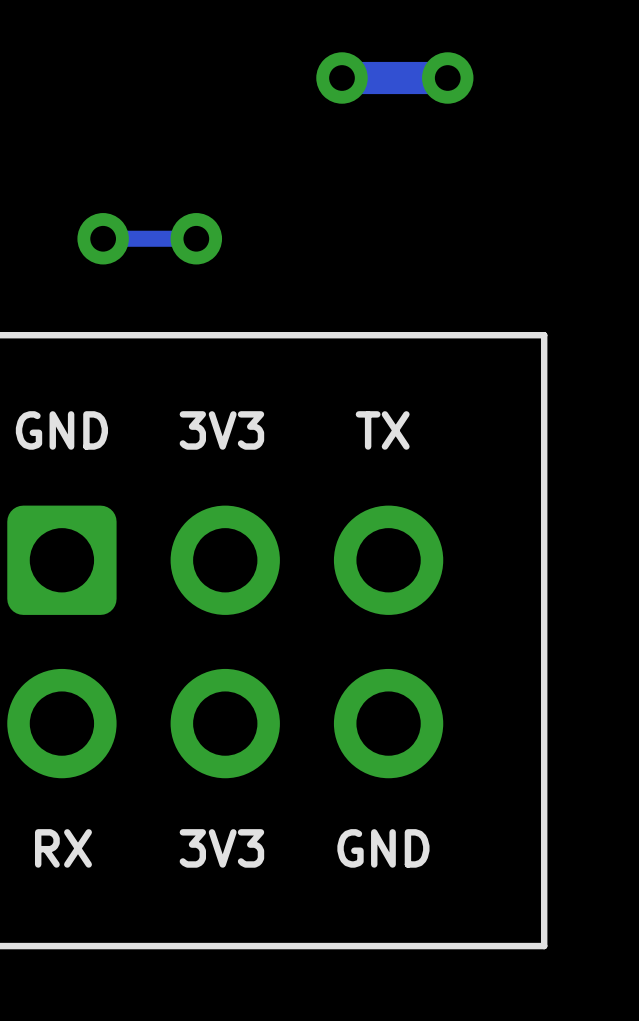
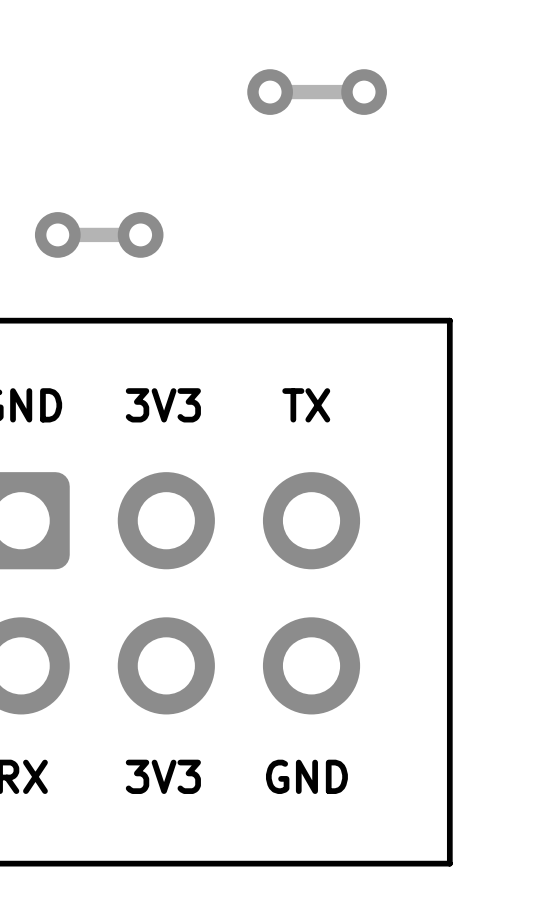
track width: thick (447, 78) (341, 78) -> thin (364, 92) (270, 92)

